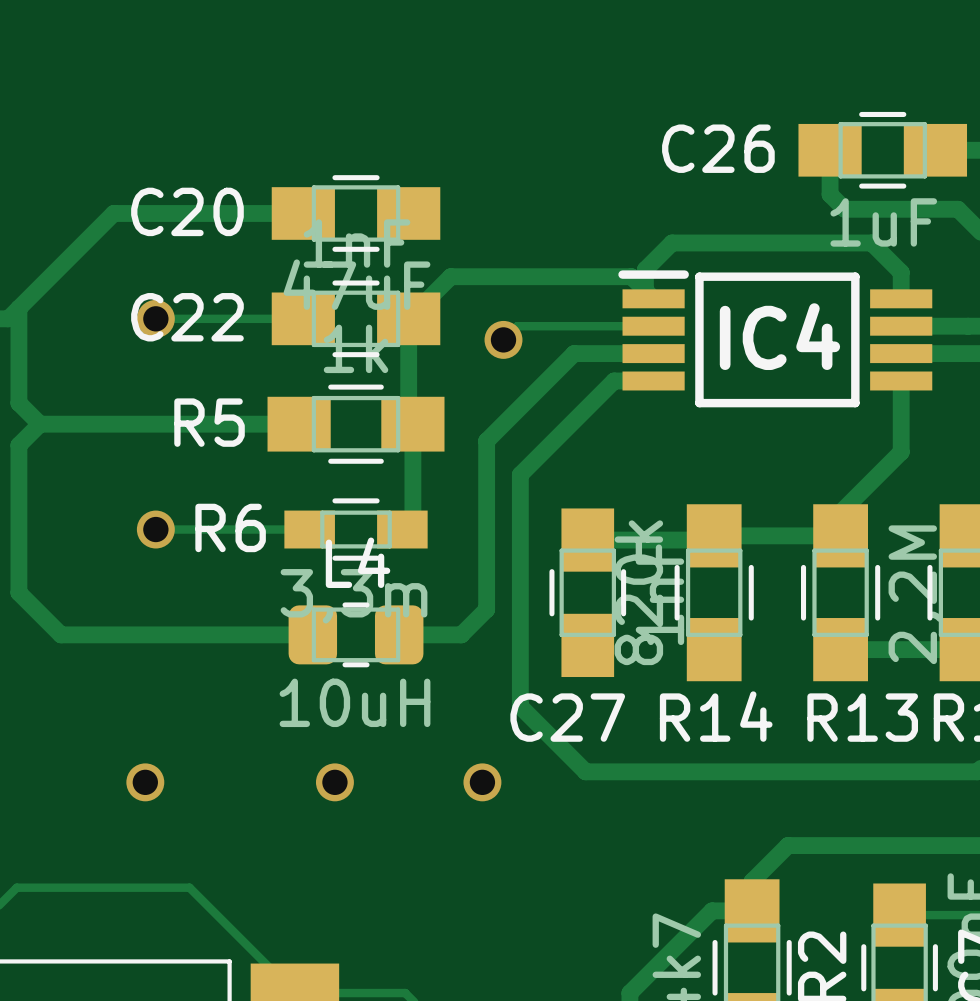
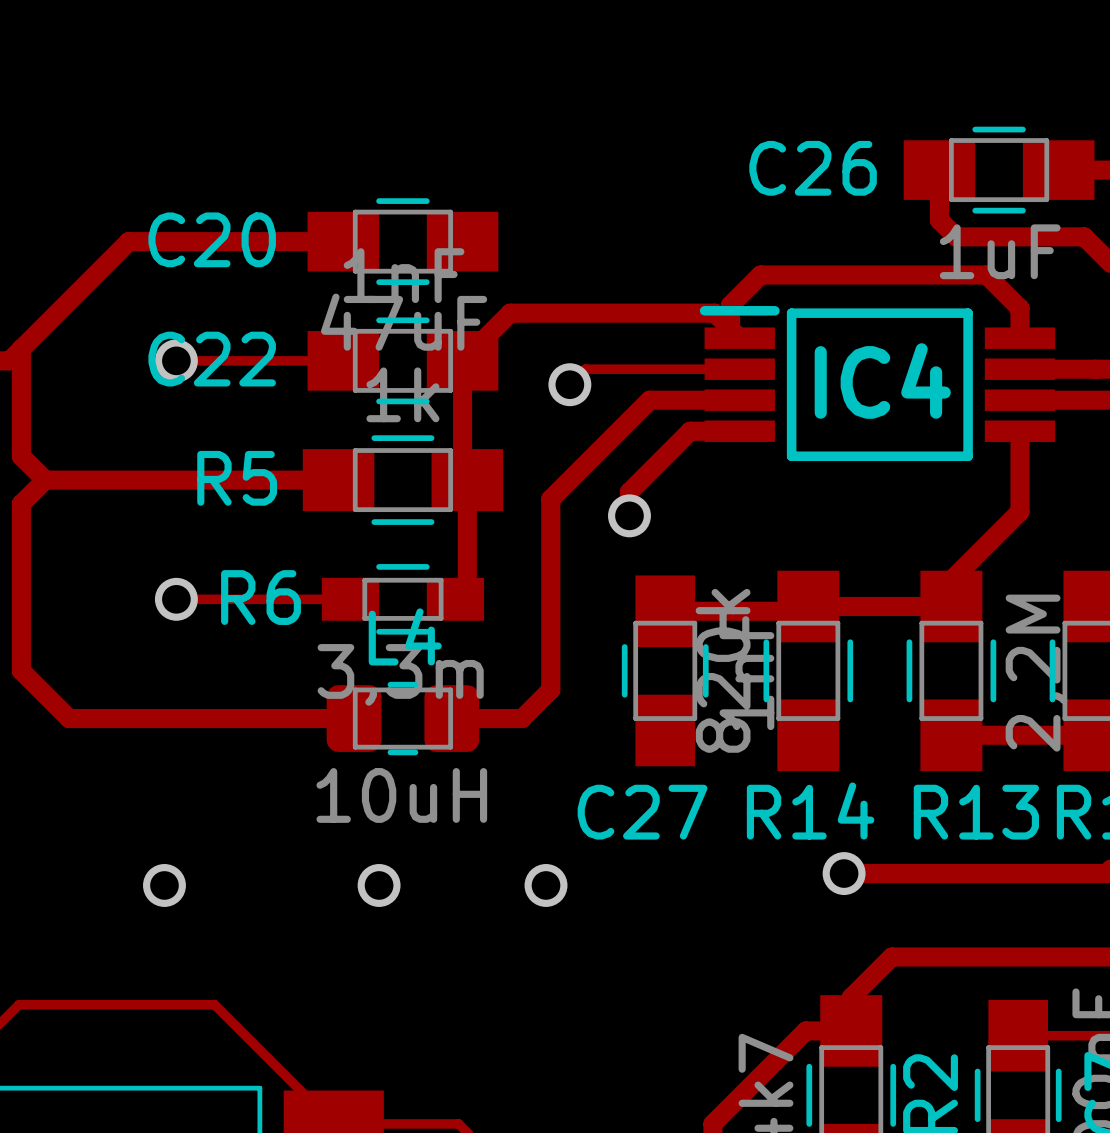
track: (614, 380) (520, 474) (520, 706) (585, 771) (745, 771) -> (695, 431) (690, 431) (629, 492) (629, 515)
via: none -> (629, 515)
via: none -> (844, 873)

